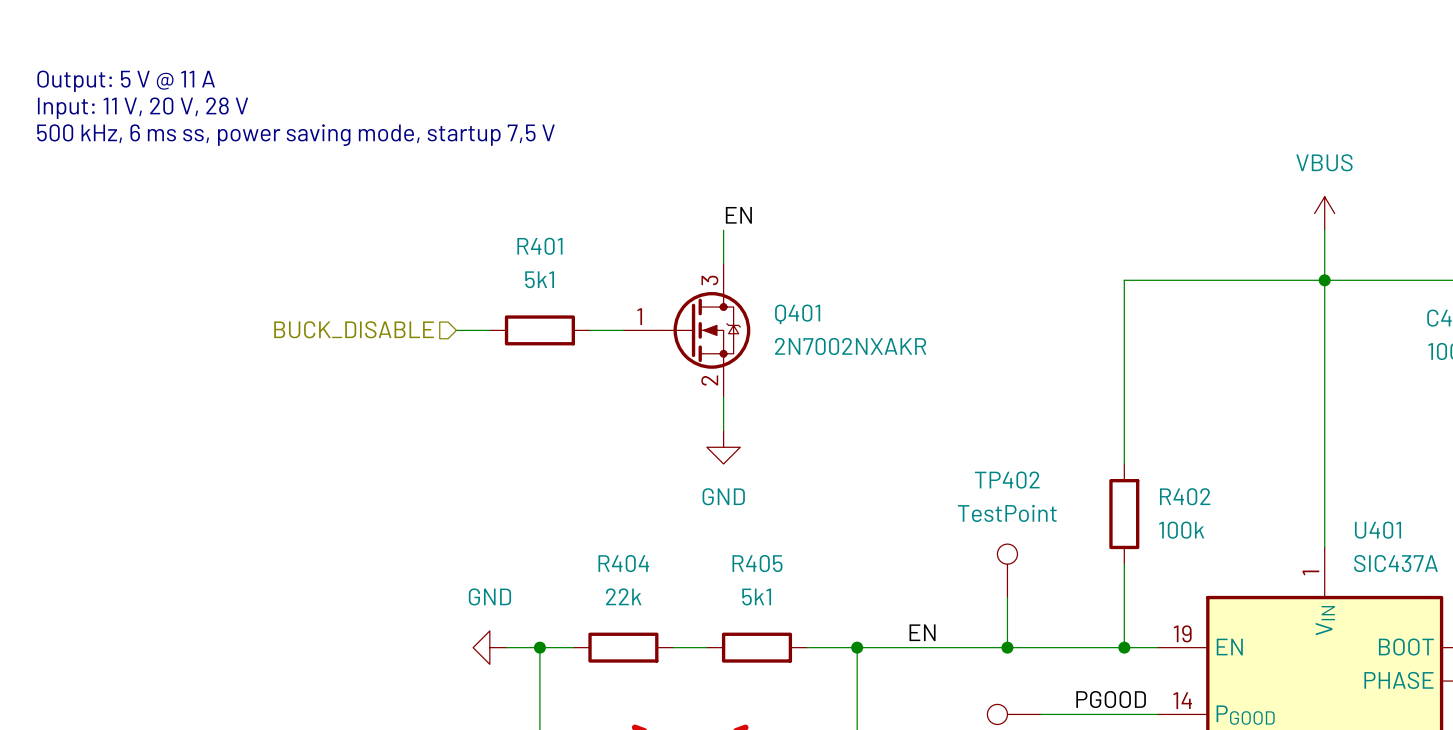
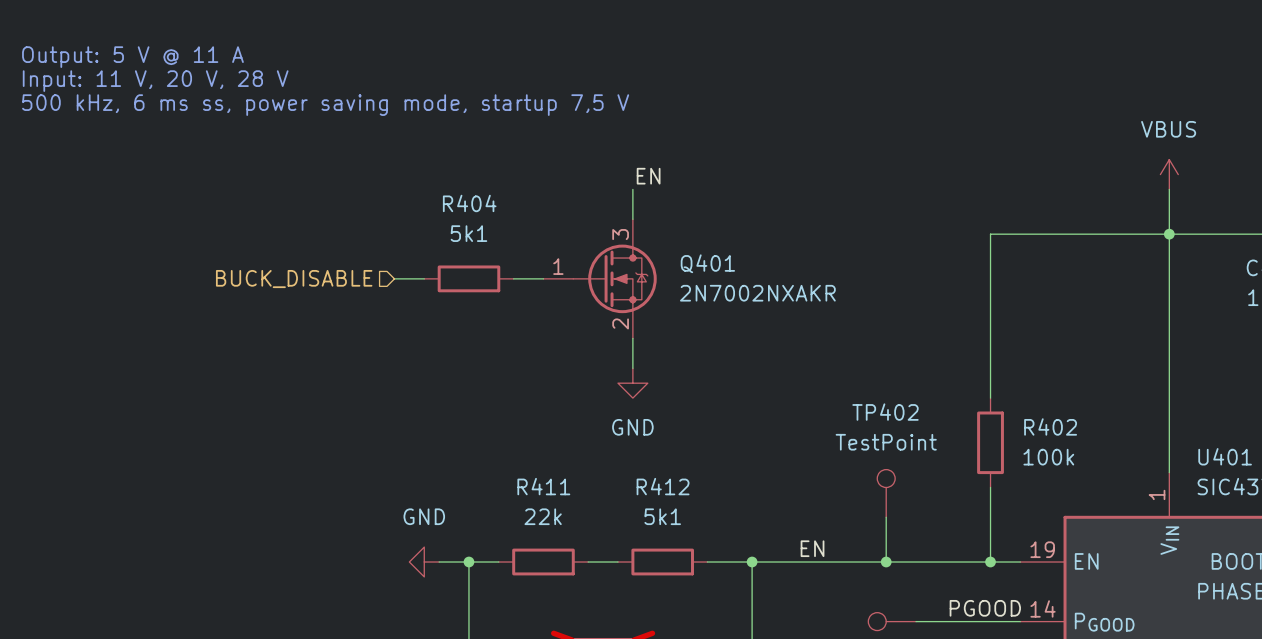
R401 name: R401 (539, 246) -> R404 (469, 203)
R404 name: R404 (623, 563) -> R411 (543, 486)
R405 name: R405 (757, 563) -> R412 (663, 486)

